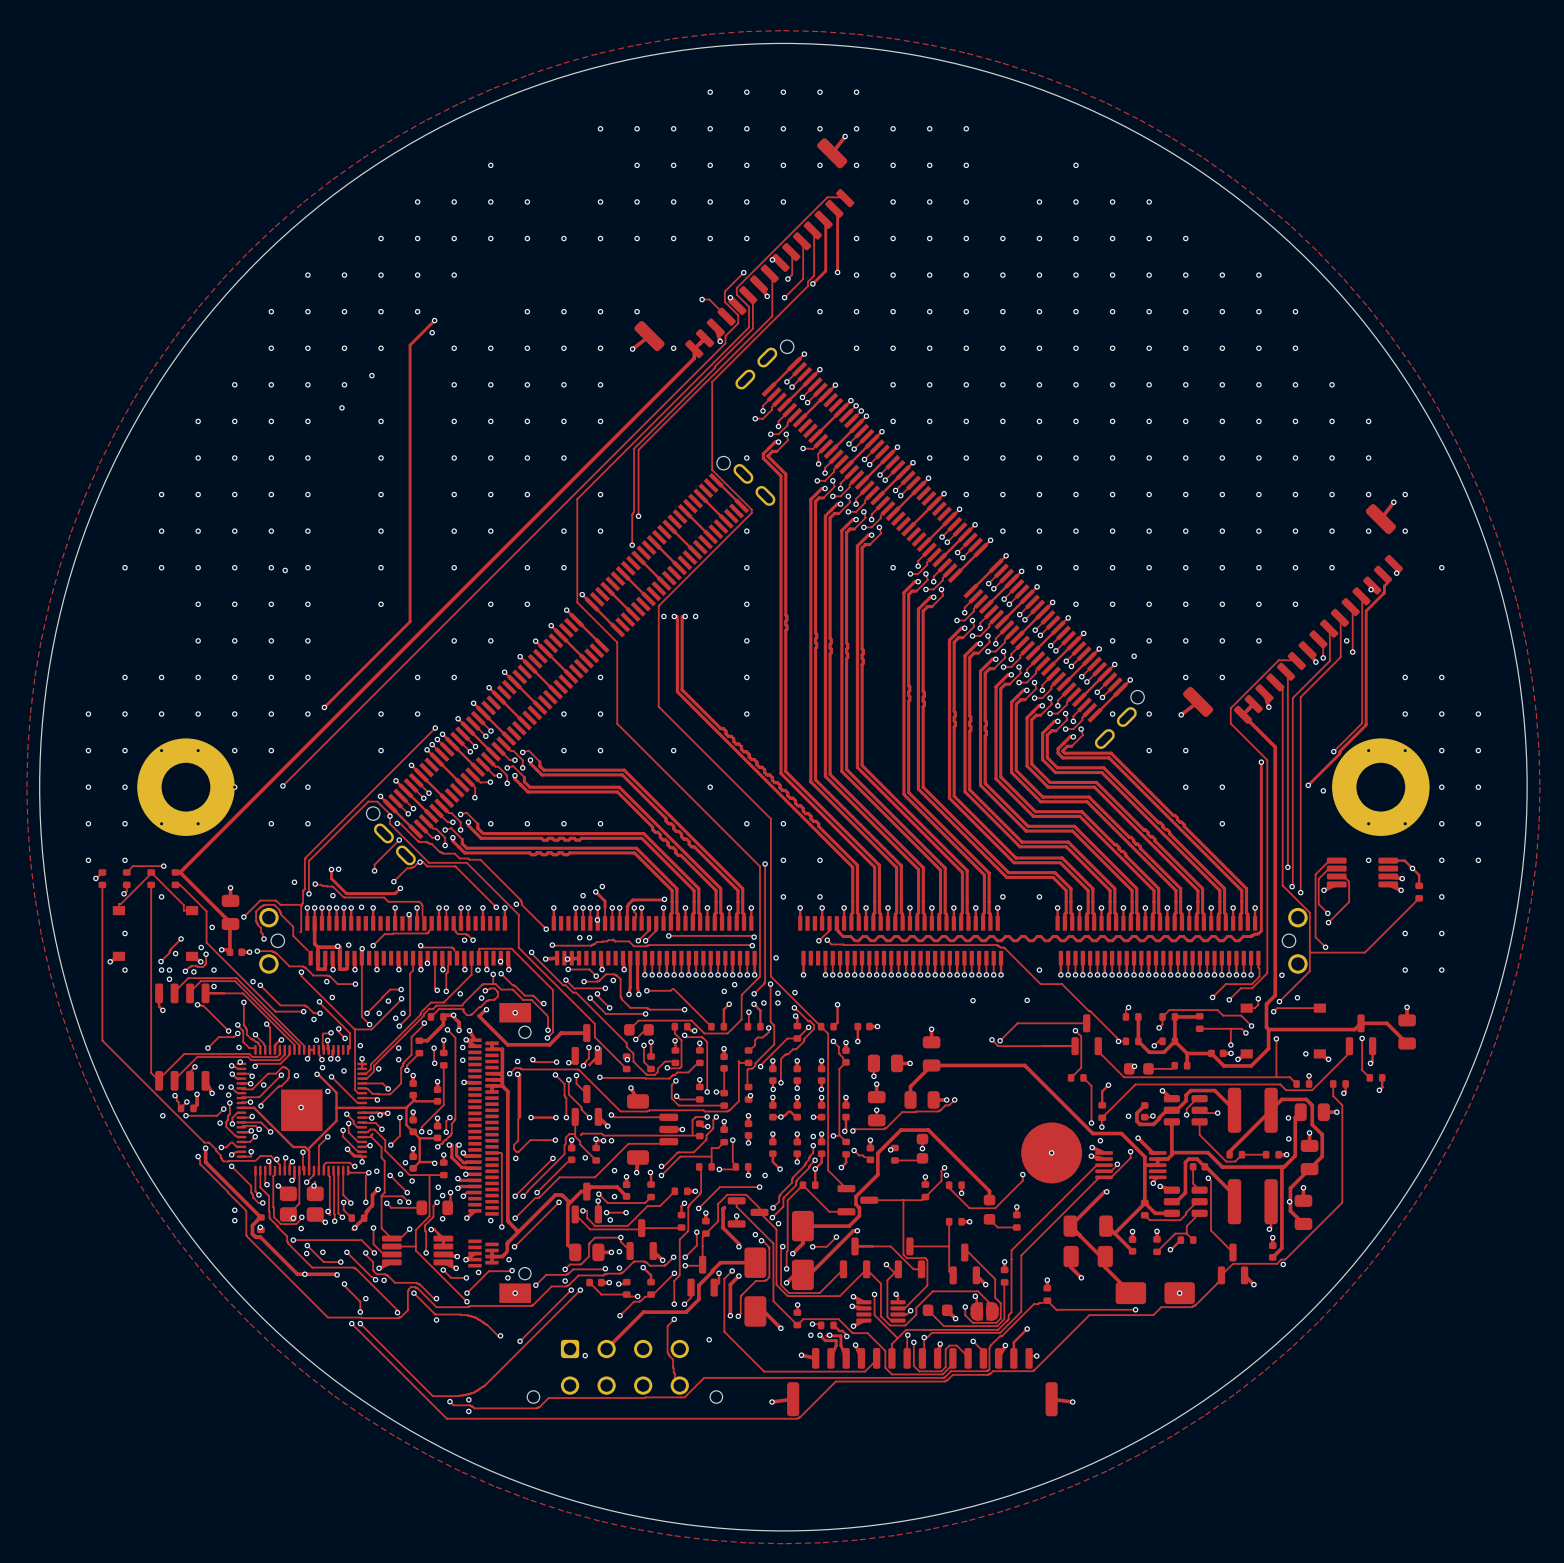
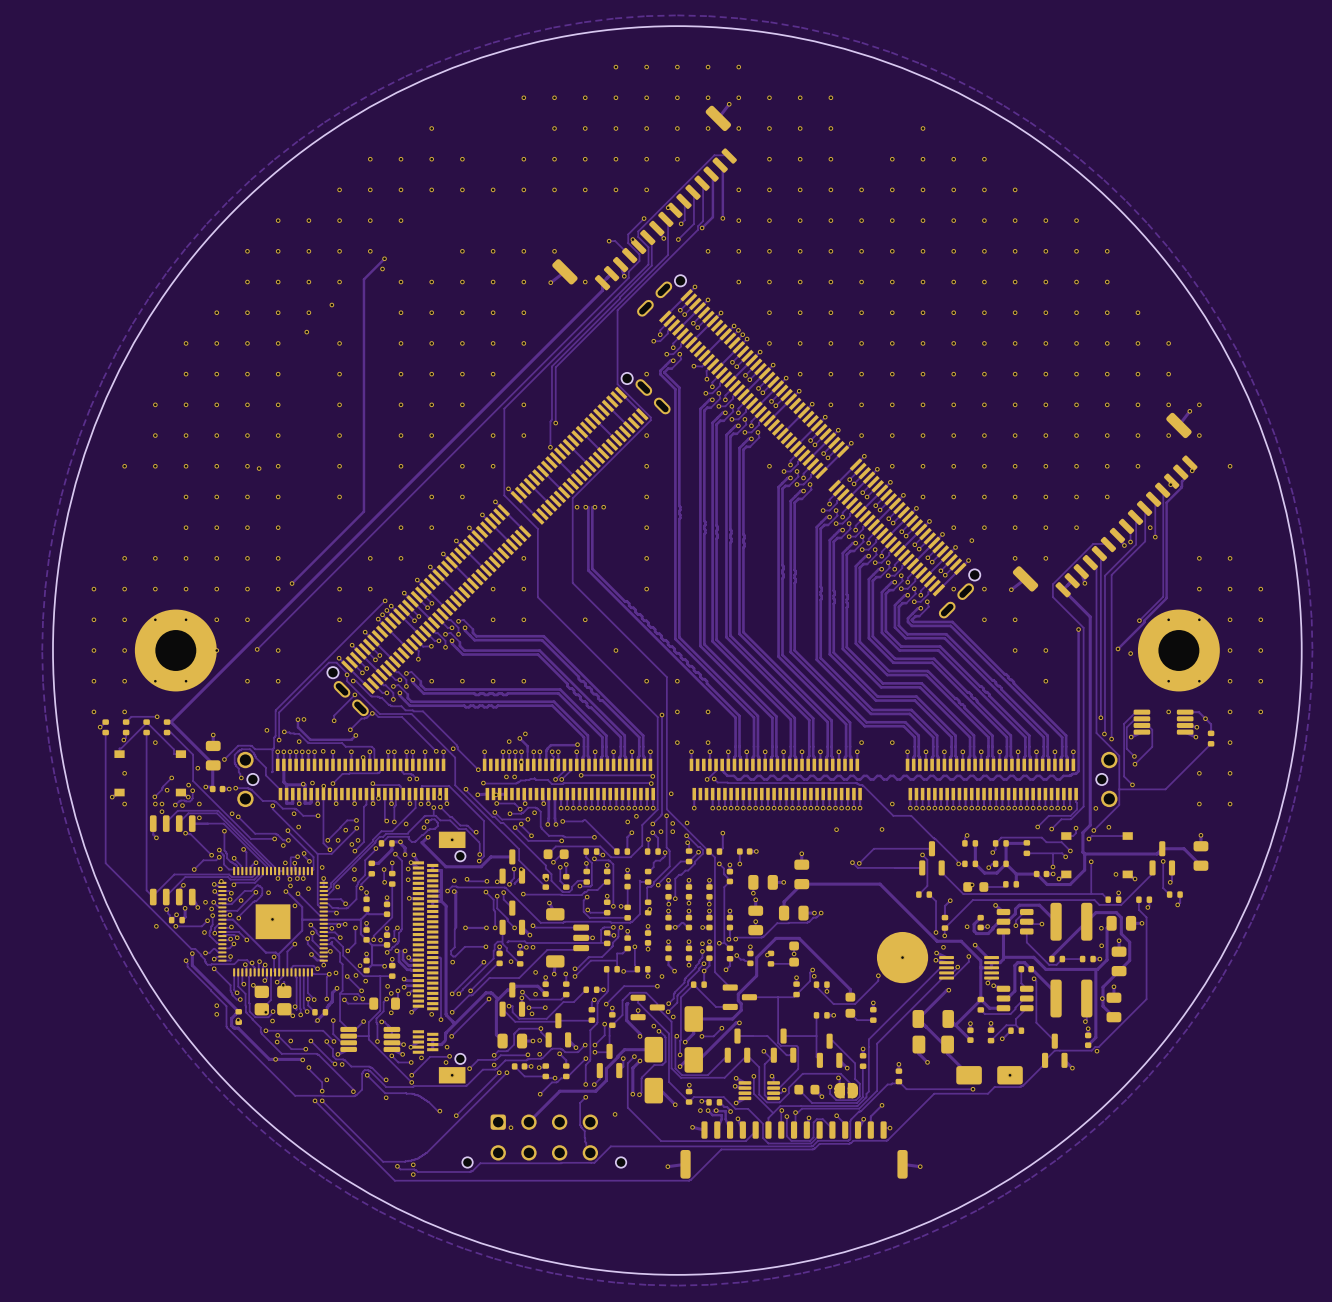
via: (465, 1174) -> none

